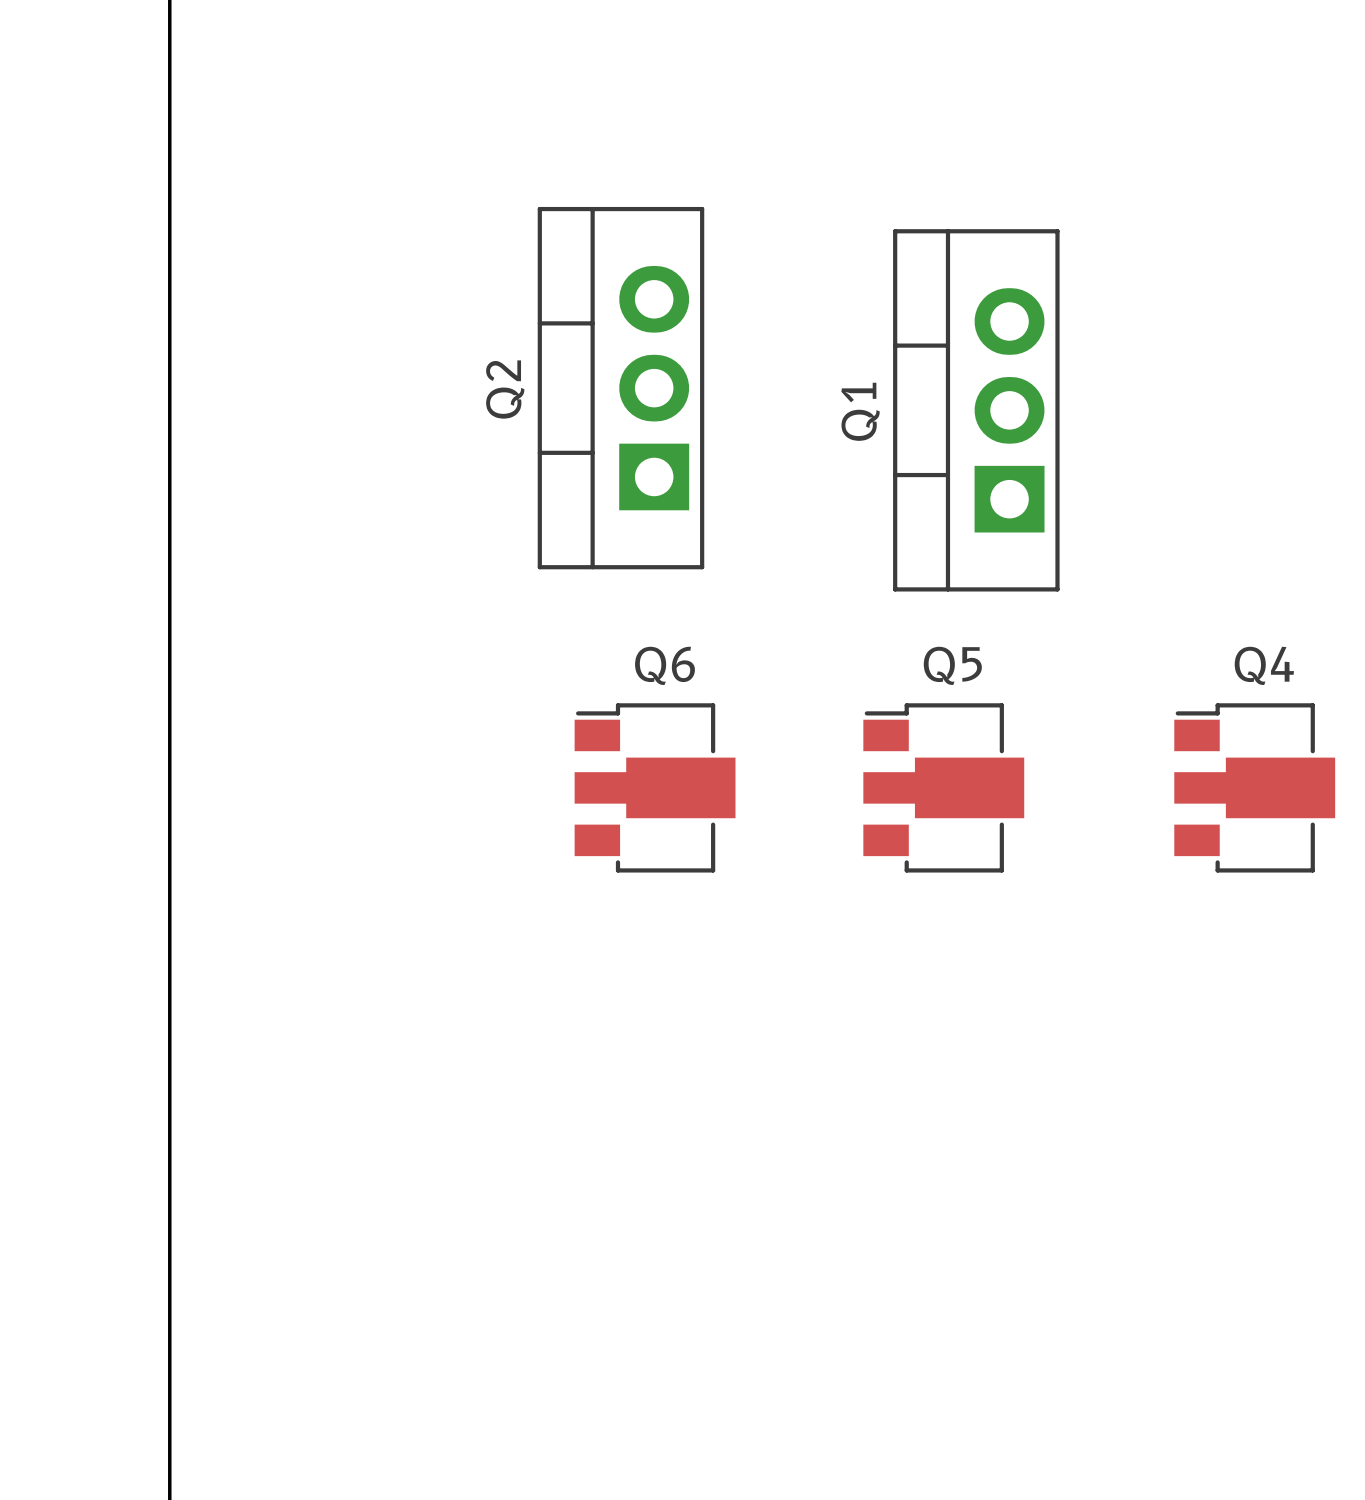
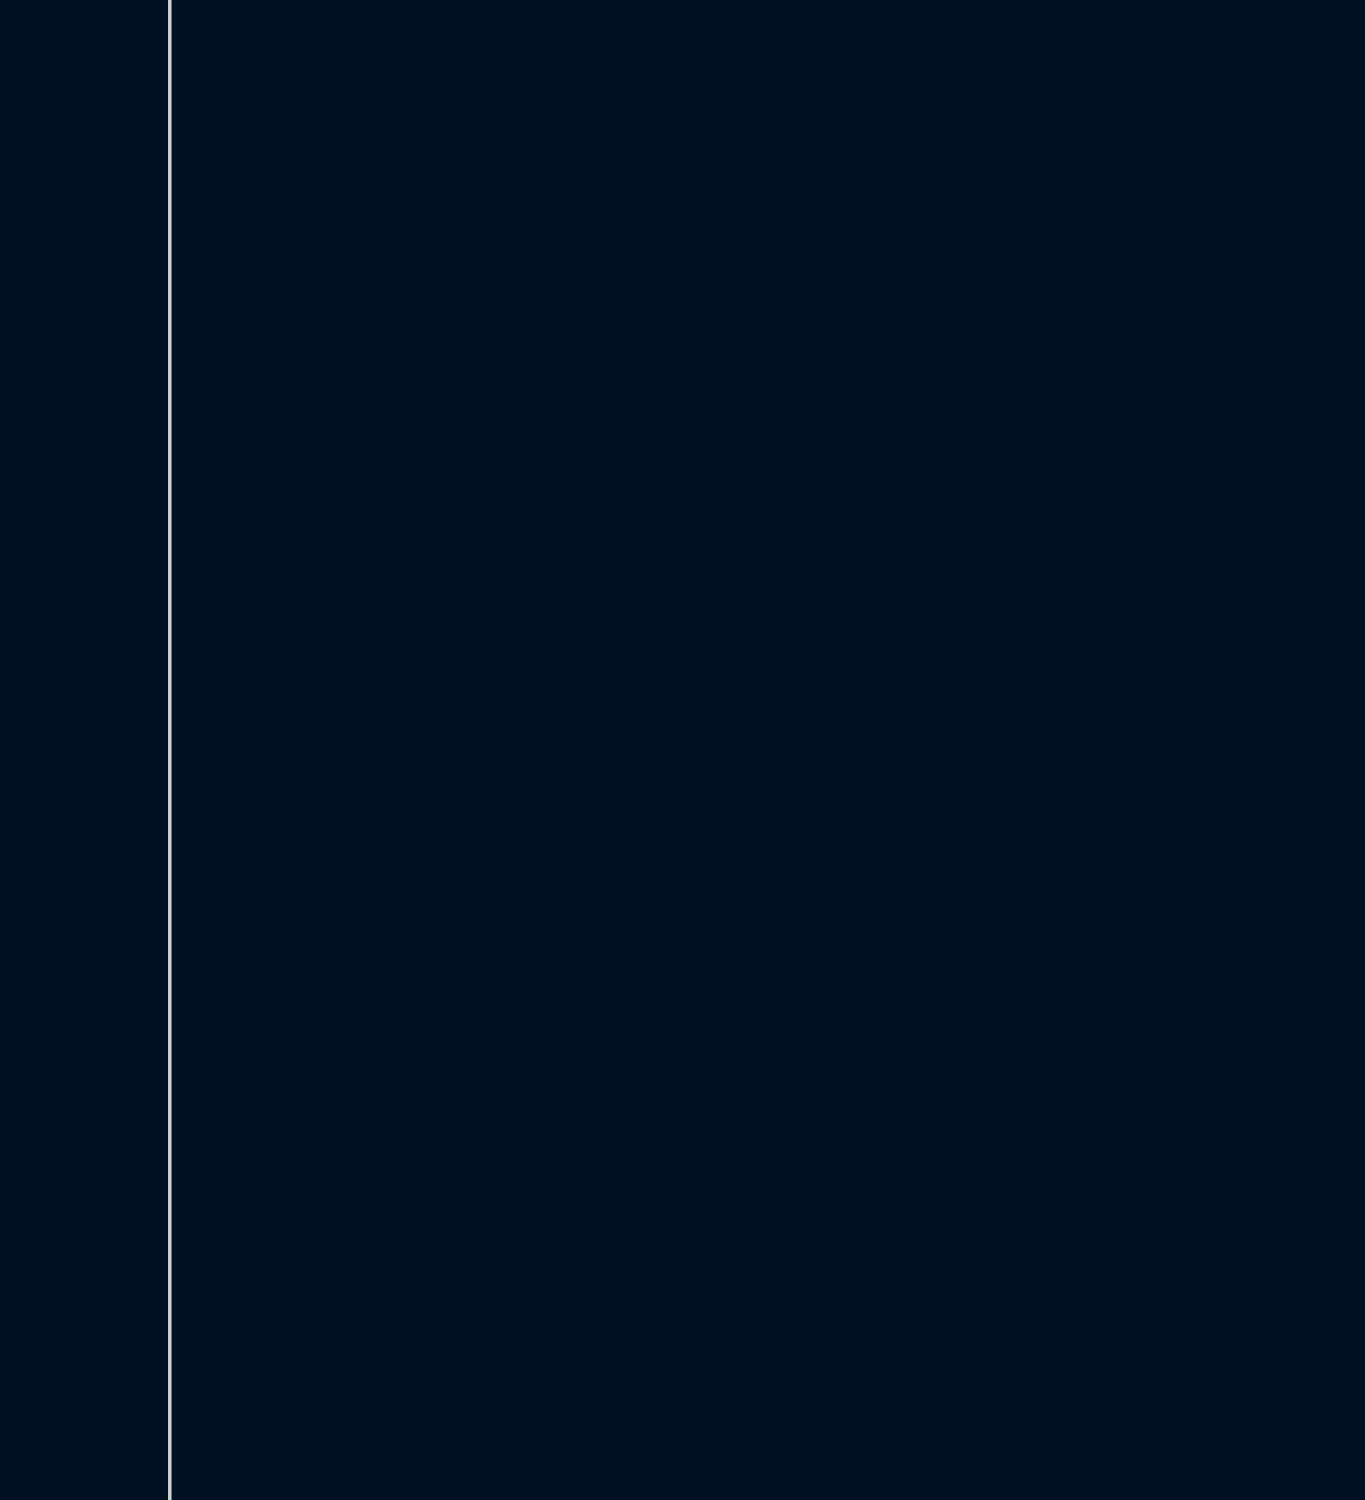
Q2: (620, 388) -> none
Q1: (976, 410) -> none
Q6: (655, 787) -> none
Q5: (943, 787) -> none
Q4: (1254, 787) -> none

